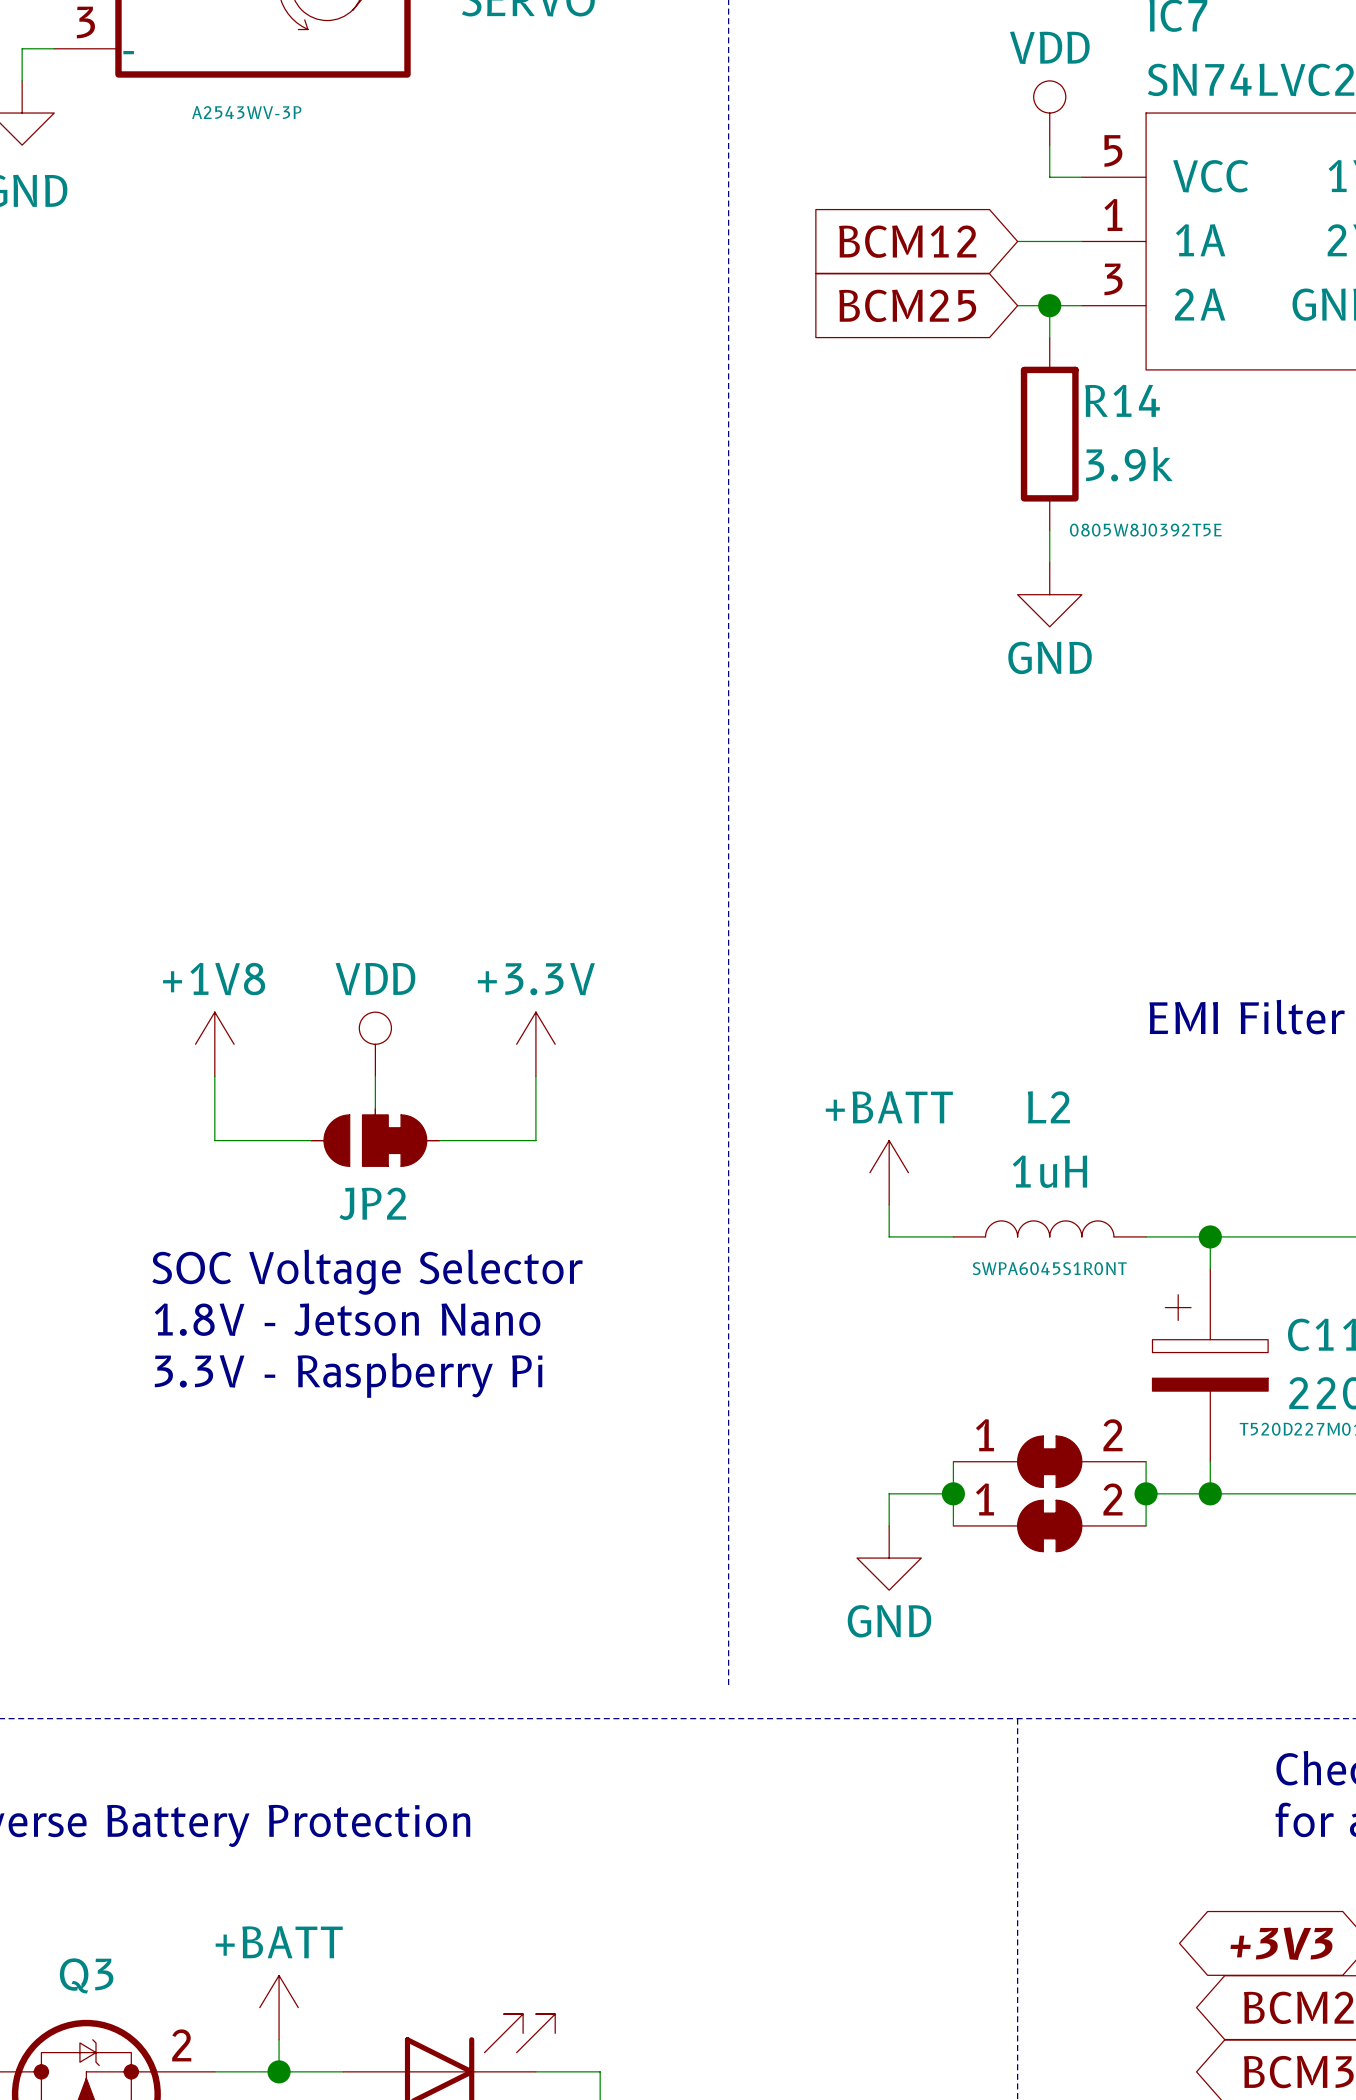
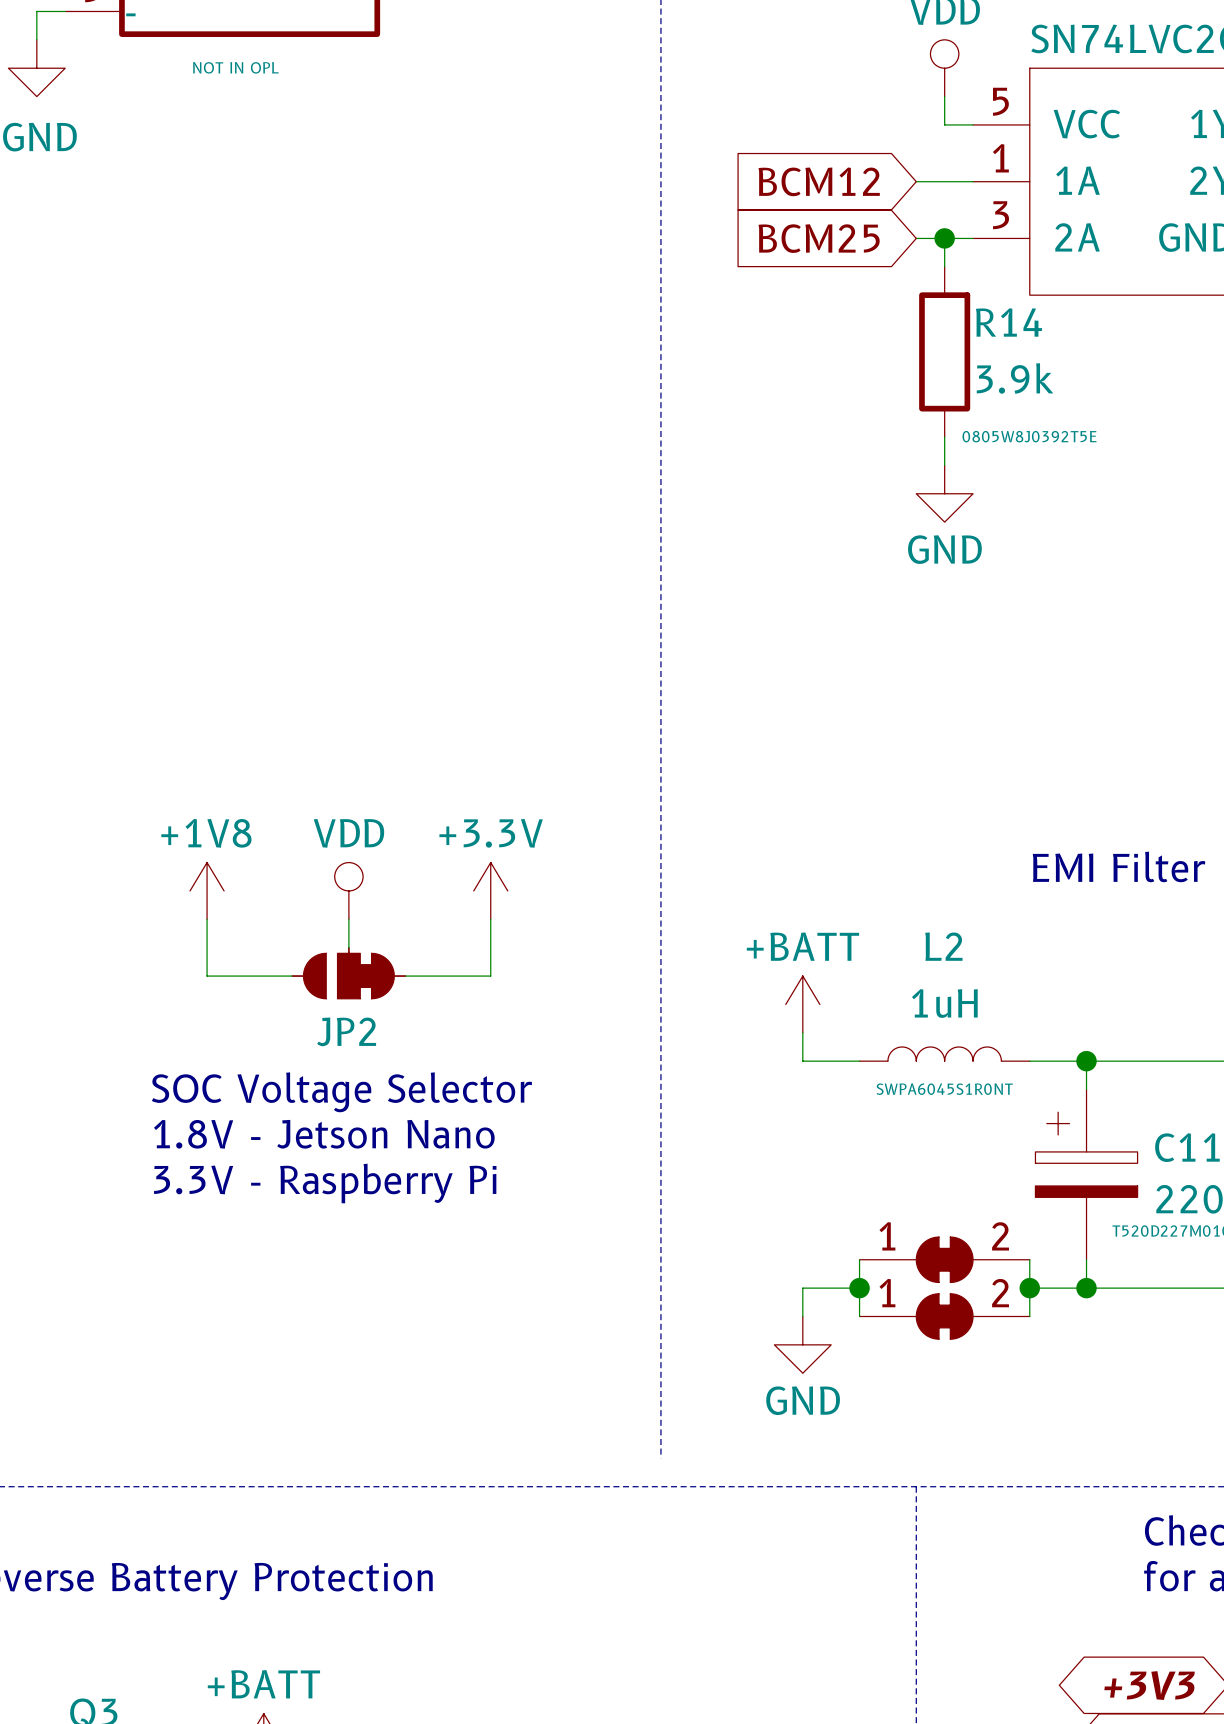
part text: A2543WV-3P (246, 112) -> NOT IN OPL (235, 67)

